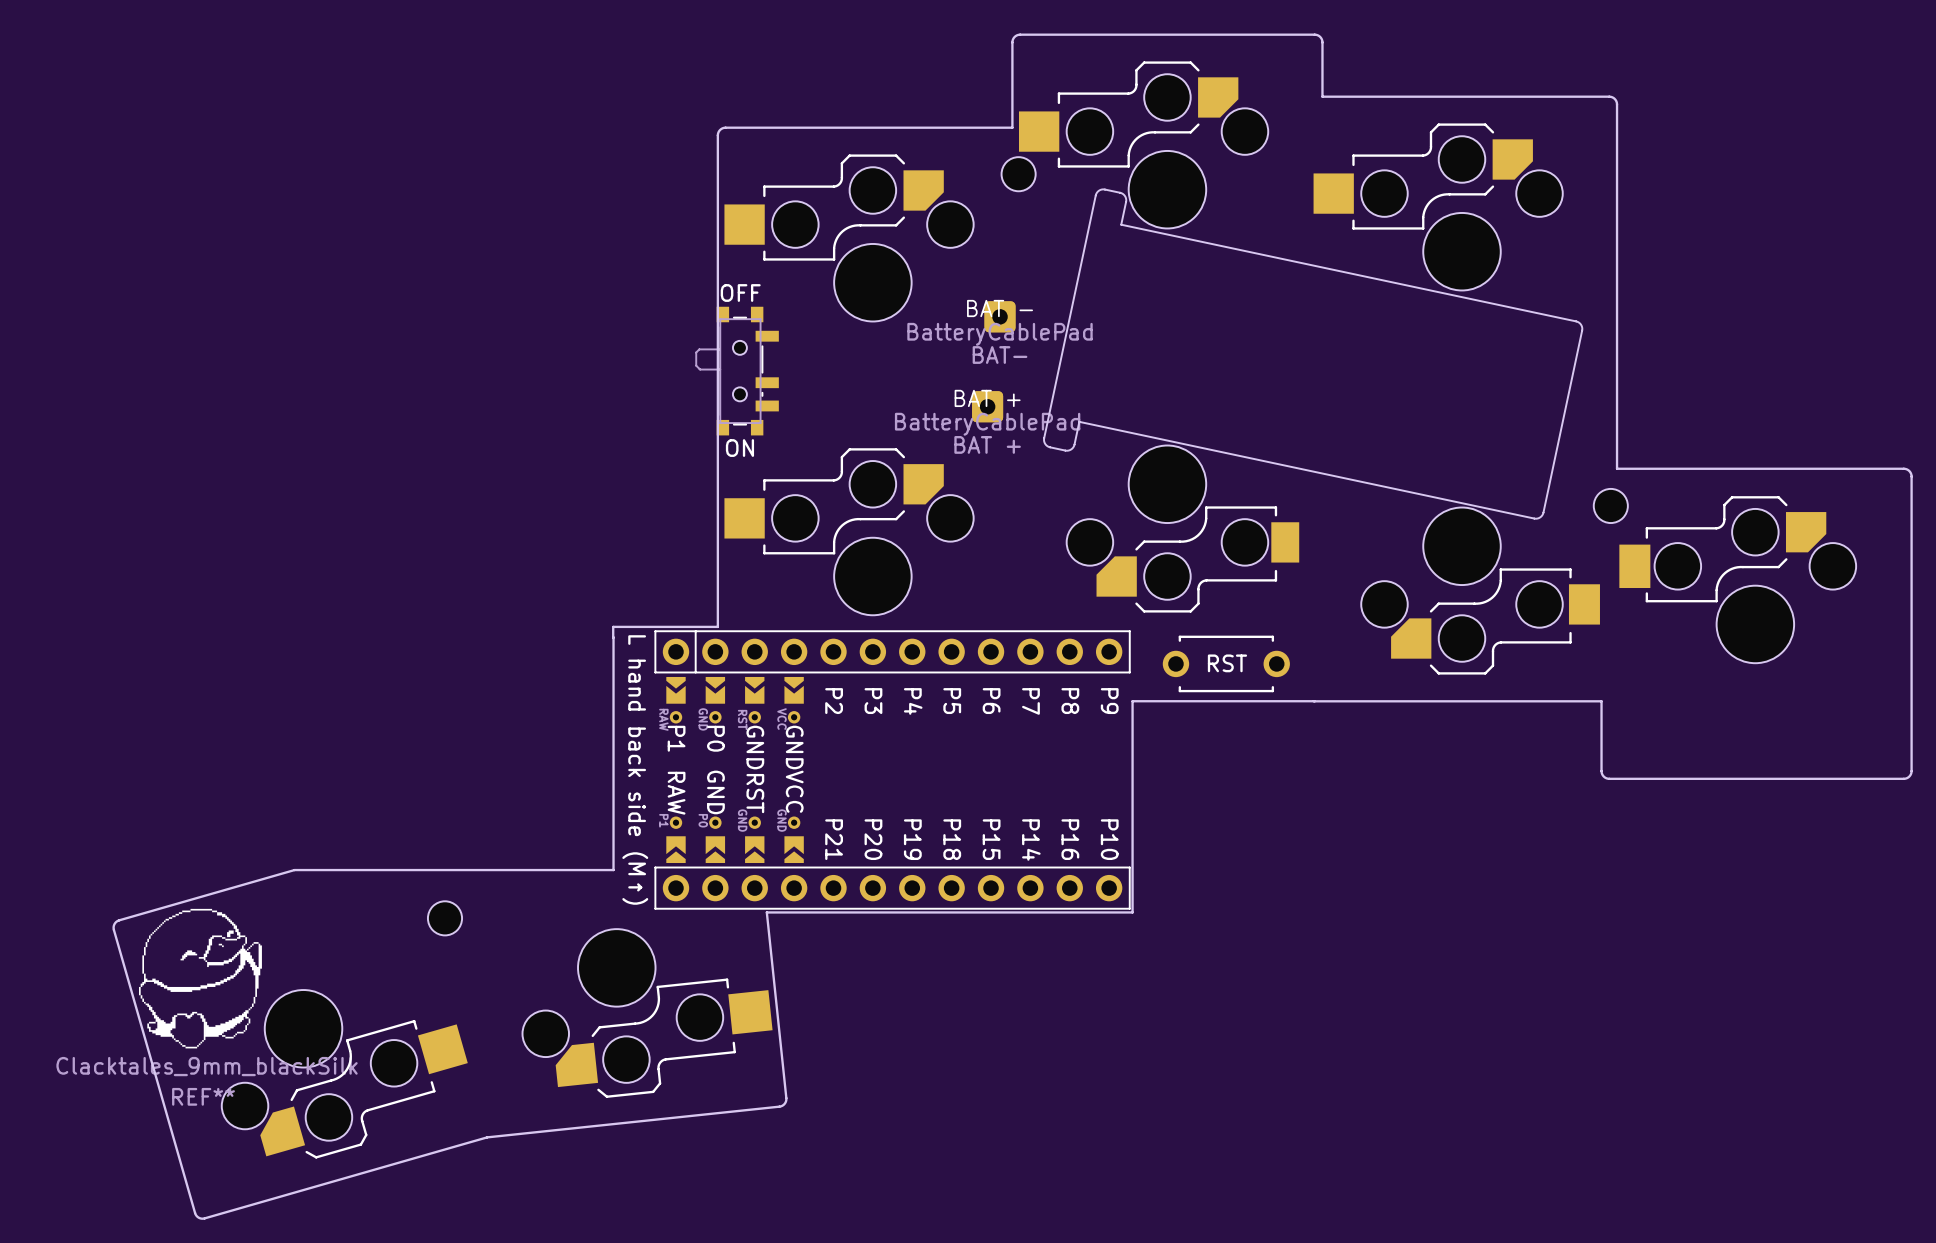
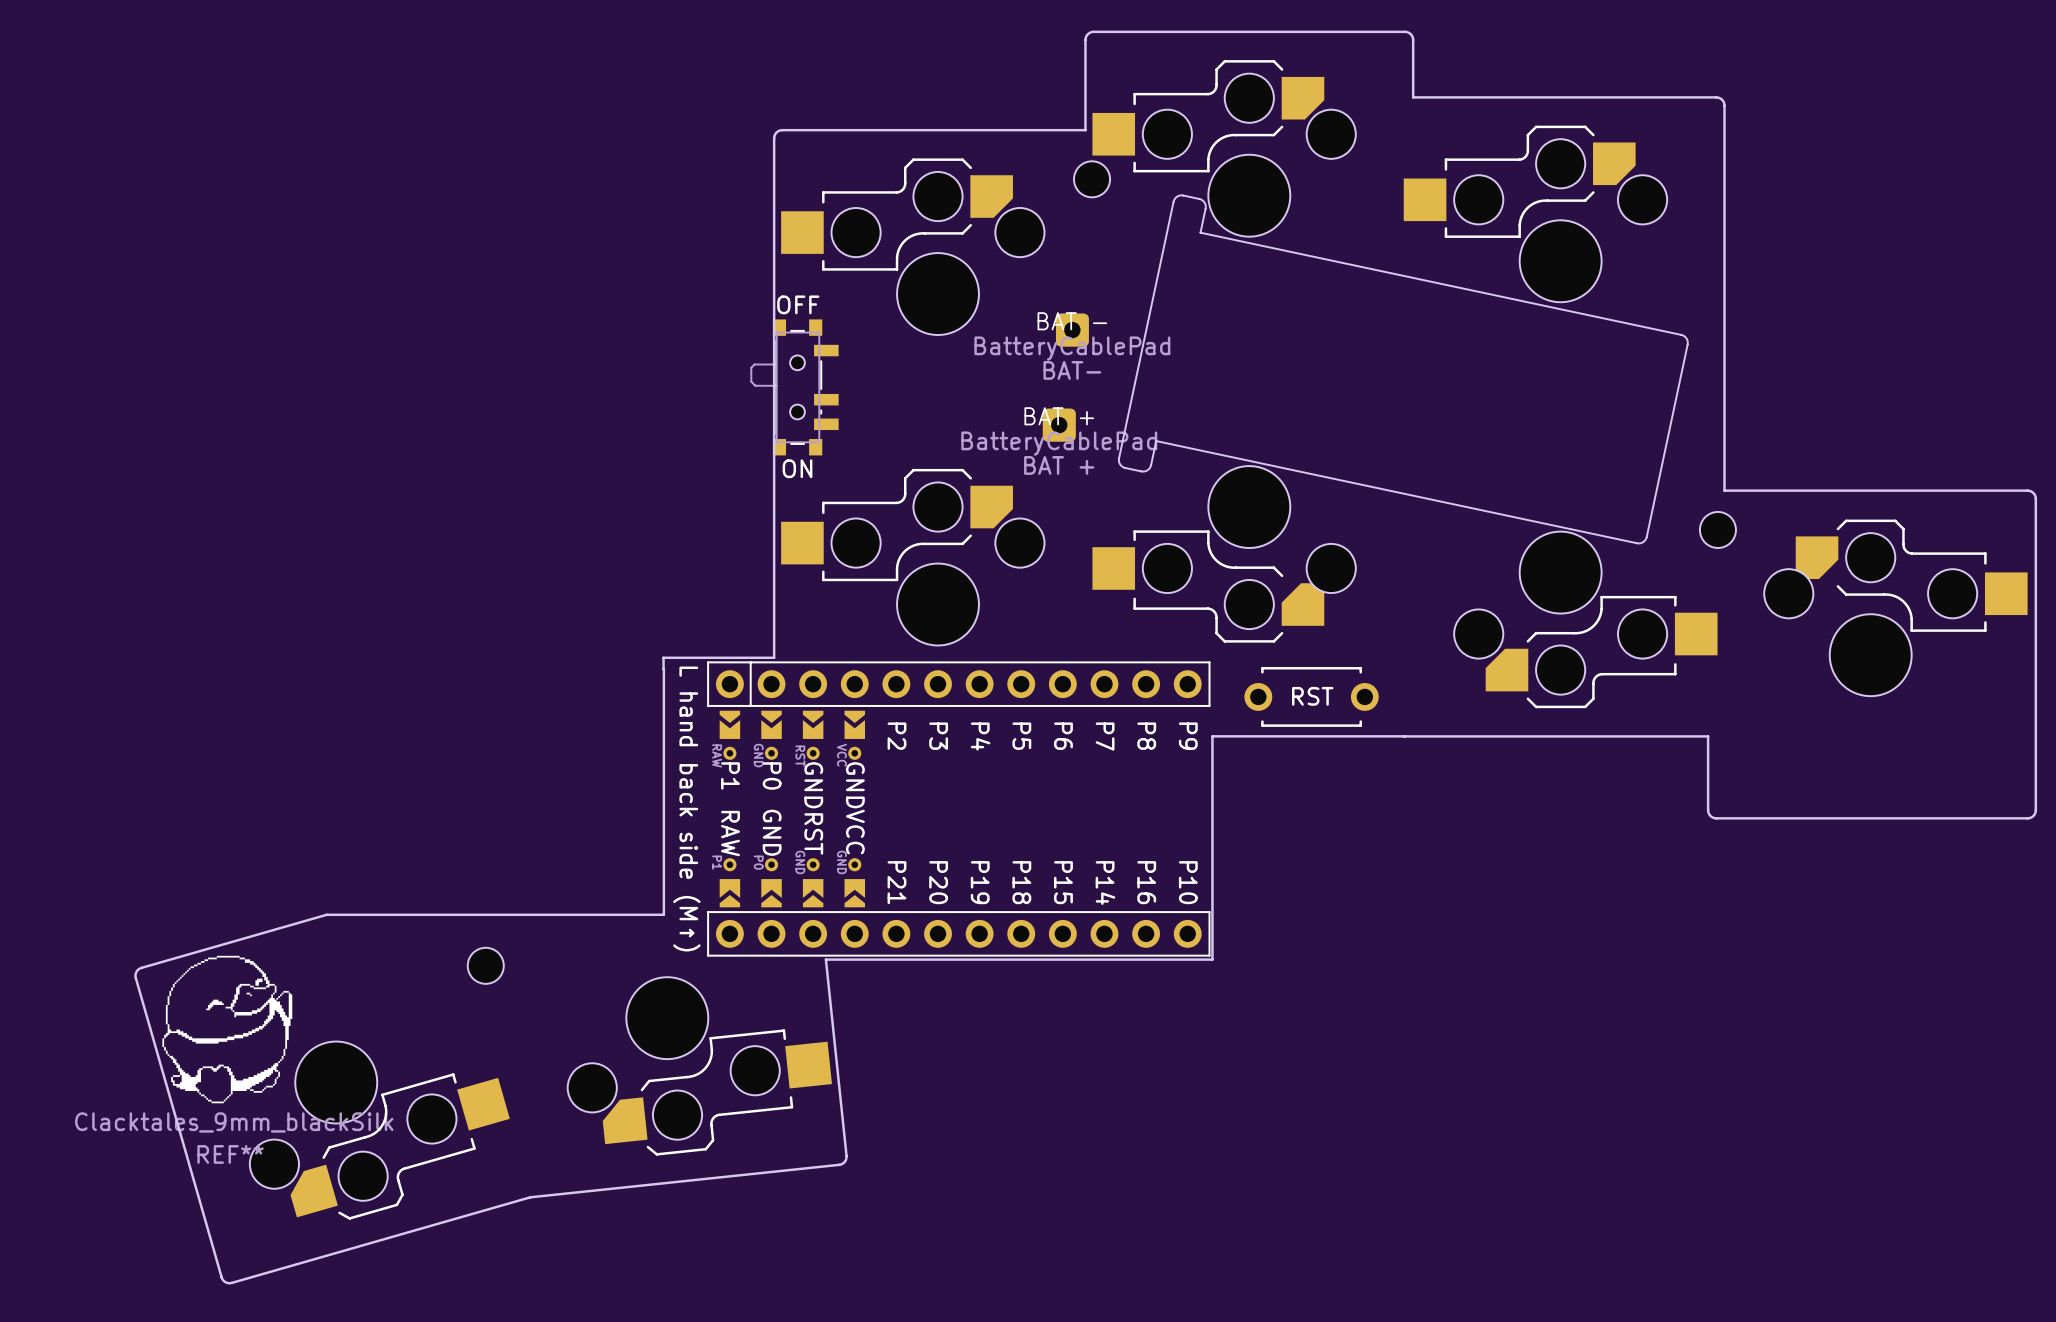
part footprint: [1361, 507, 1600, 675] -> [1454, 531, 1718, 709]
part: none -> (1224, 554)
part: (1182, 529) -> none
part: (1737, 579) -> none
part: none -> (1895, 607)

